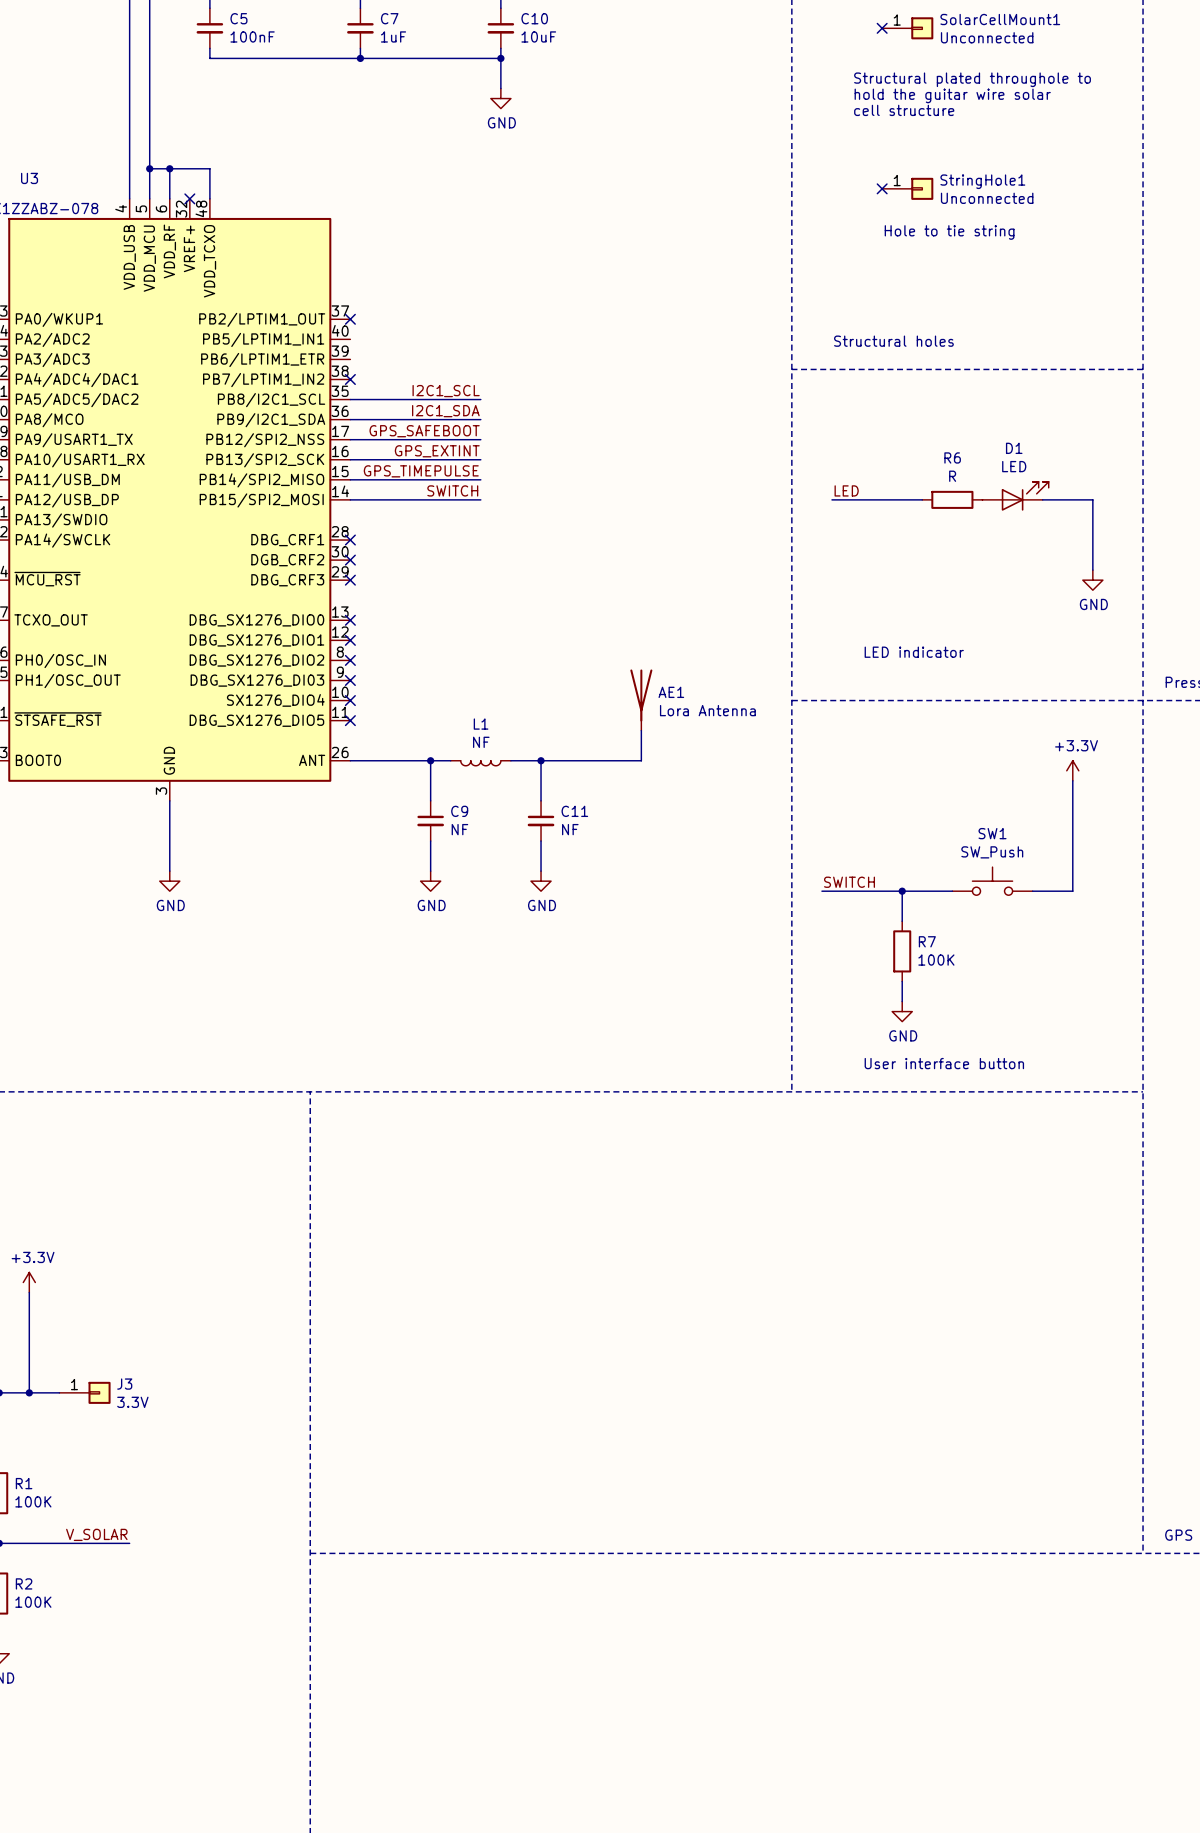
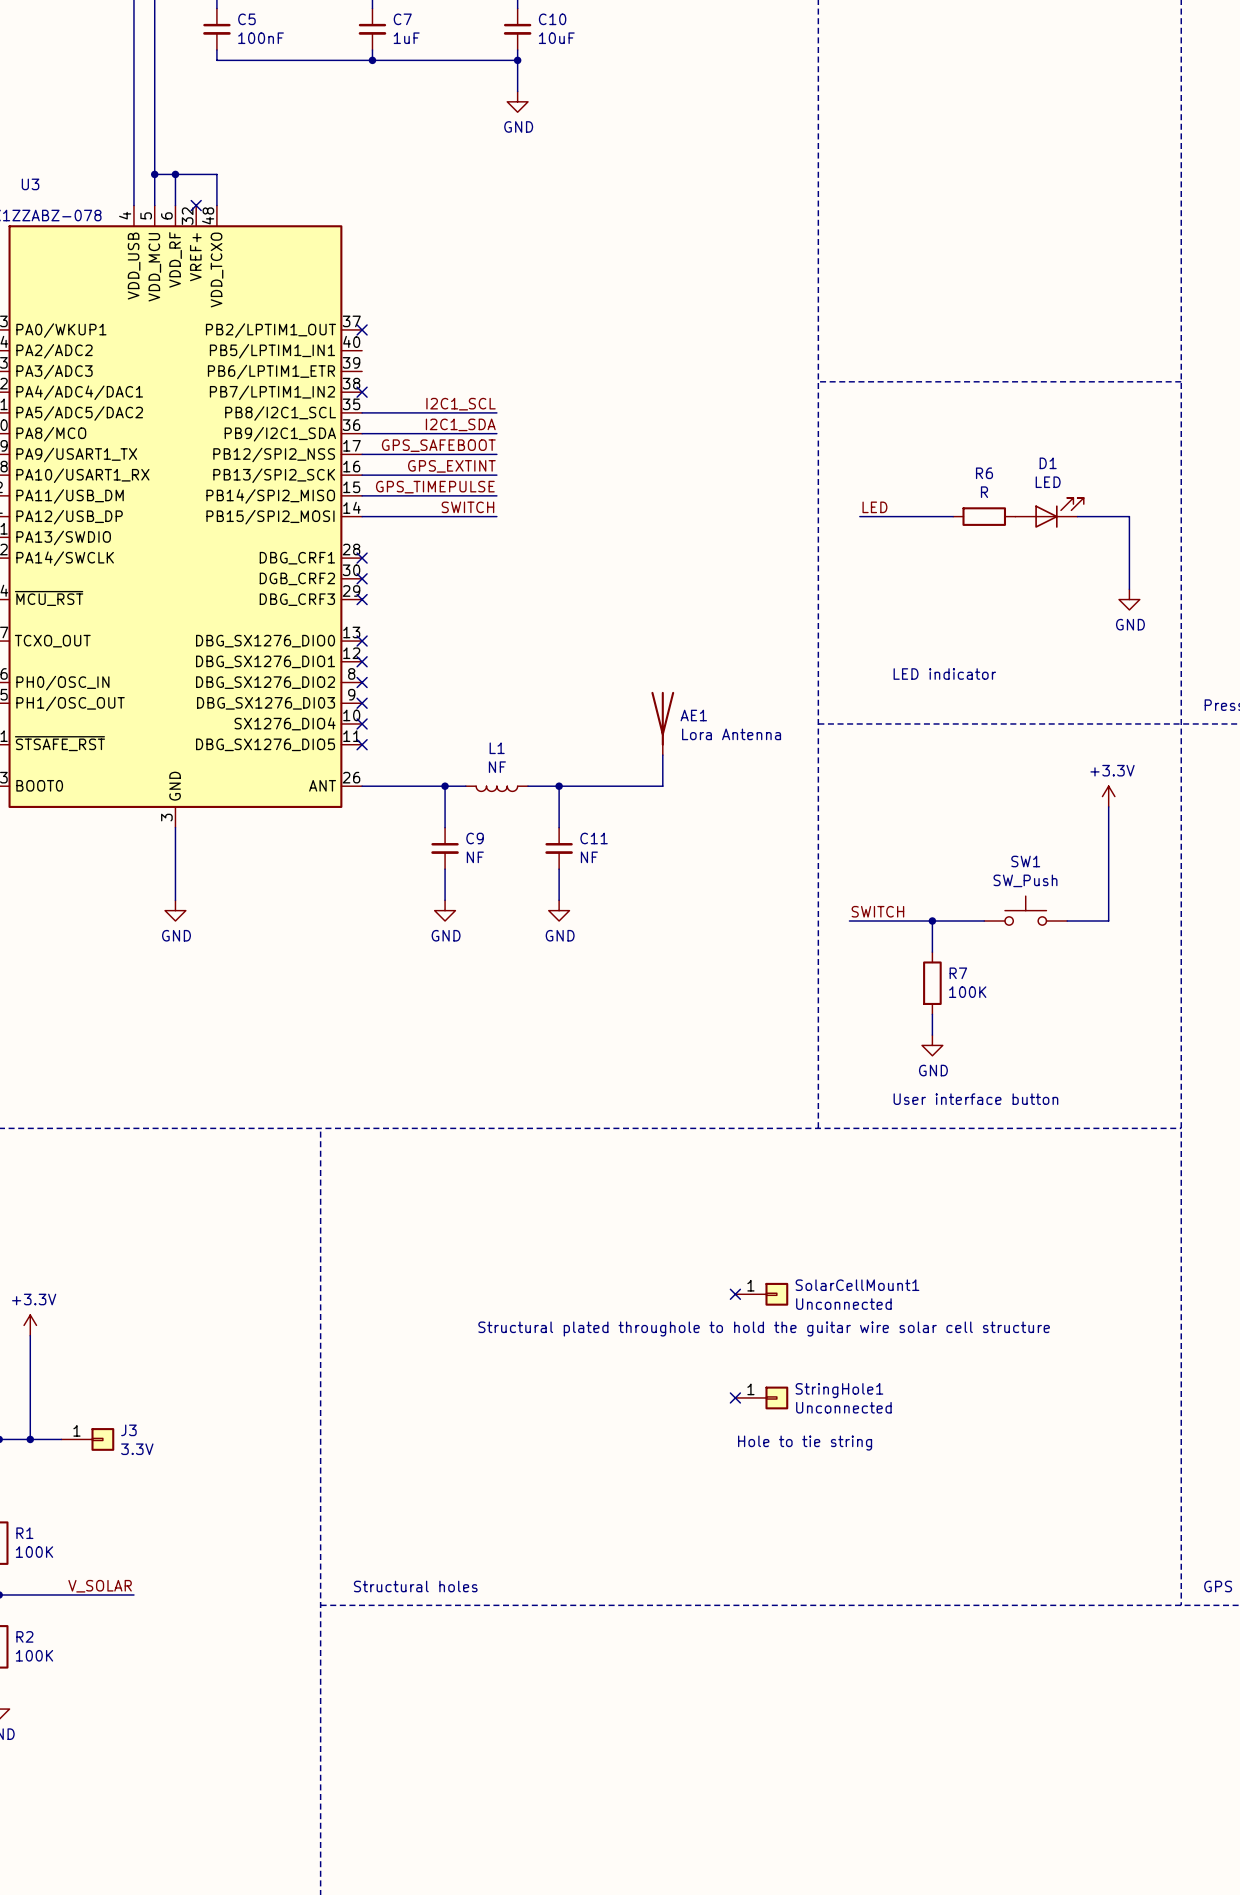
no-connect mark: (882, 28) -> none
SolarCellMount1 position: (907, 28) -> (761, 1294)
text: Structural plated throughole to (972, 79) -> none
text: hold the guitar wire solar (952, 95) -> none
text: cell structure (904, 110) -> none
no-connect mark: (882, 188) -> none
StringHole1 position: (907, 188) -> (761, 1397)
text: Hole to tie string (949, 232) -> none
text: Structural holes (893, 341) -> none
no-connect mark: none -> (735, 1294)
text: none -> Structural plated throughole to hold the guitar wire solar cell structure (764, 1328)
no-connect mark: none -> (735, 1397)
text: none -> Hole to tie string (805, 1443)
text: none -> Structural holes (415, 1586)

